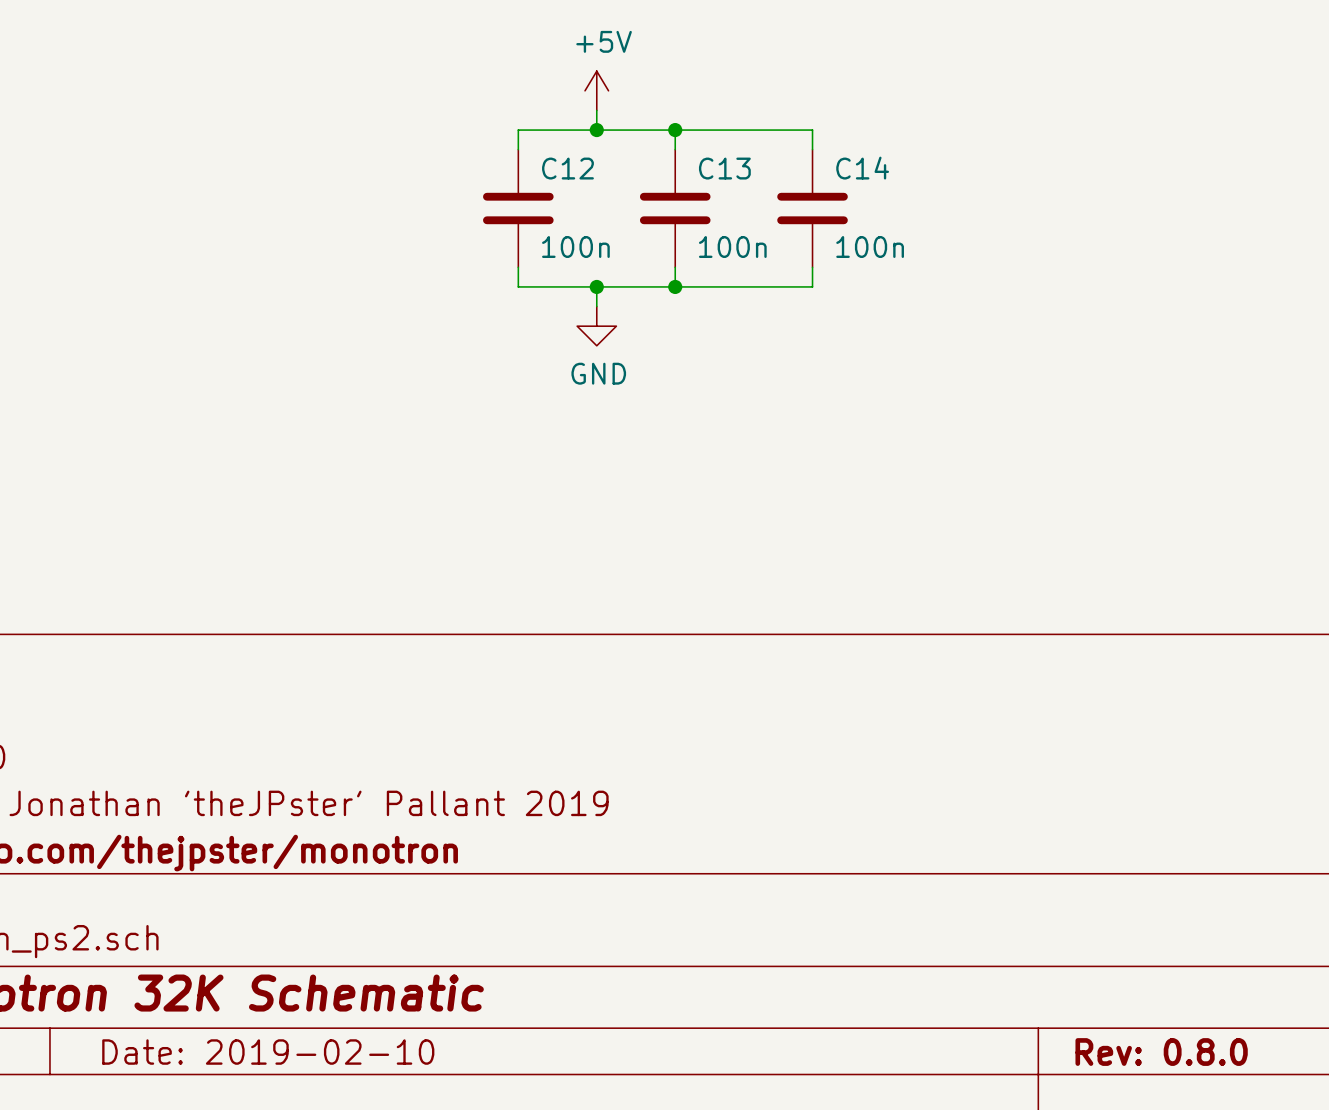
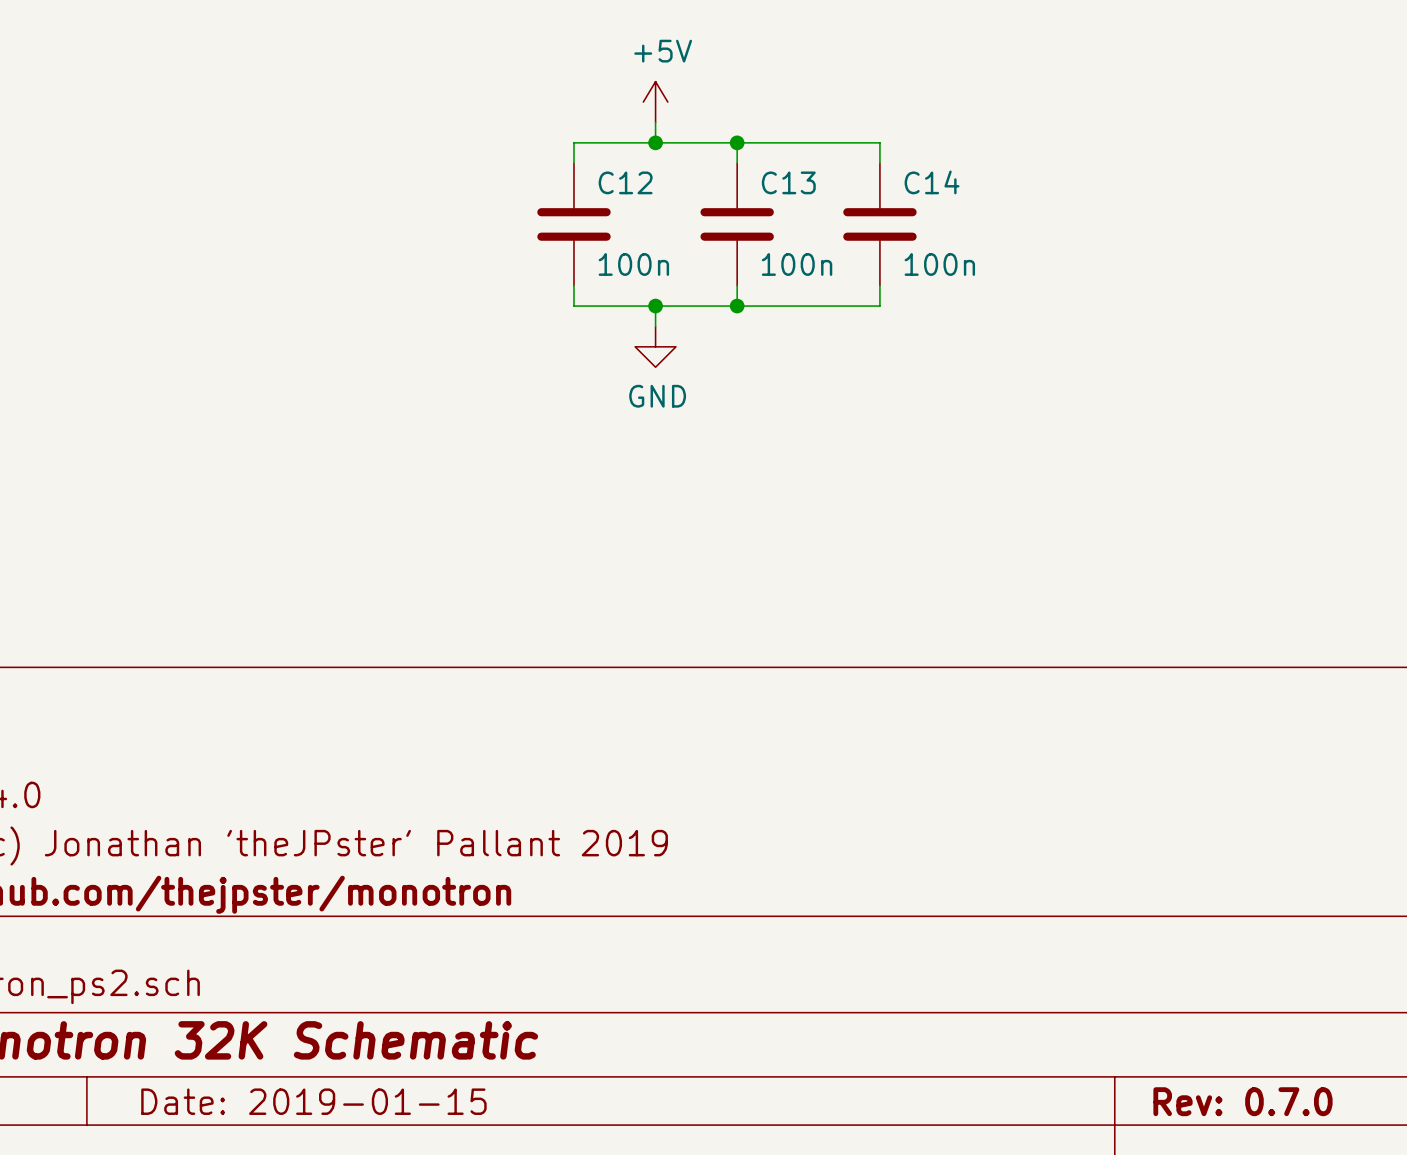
title block: Date: 2019-02-10 (268, 1052) -> Date: 2019-01-15 (313, 1101)
title block: Rev: 0.8.0 (1161, 1052) -> Rev: 0.7.0 (1242, 1101)

